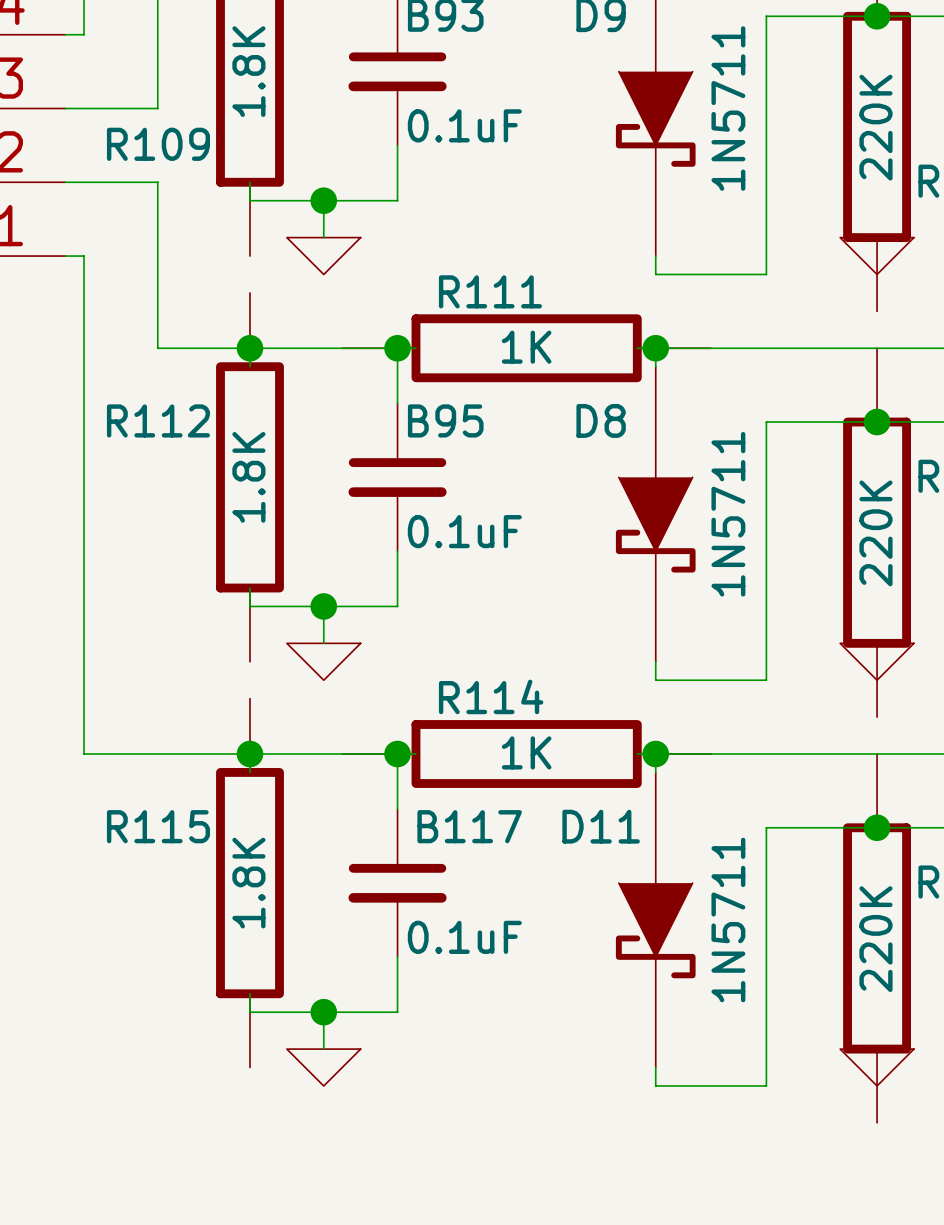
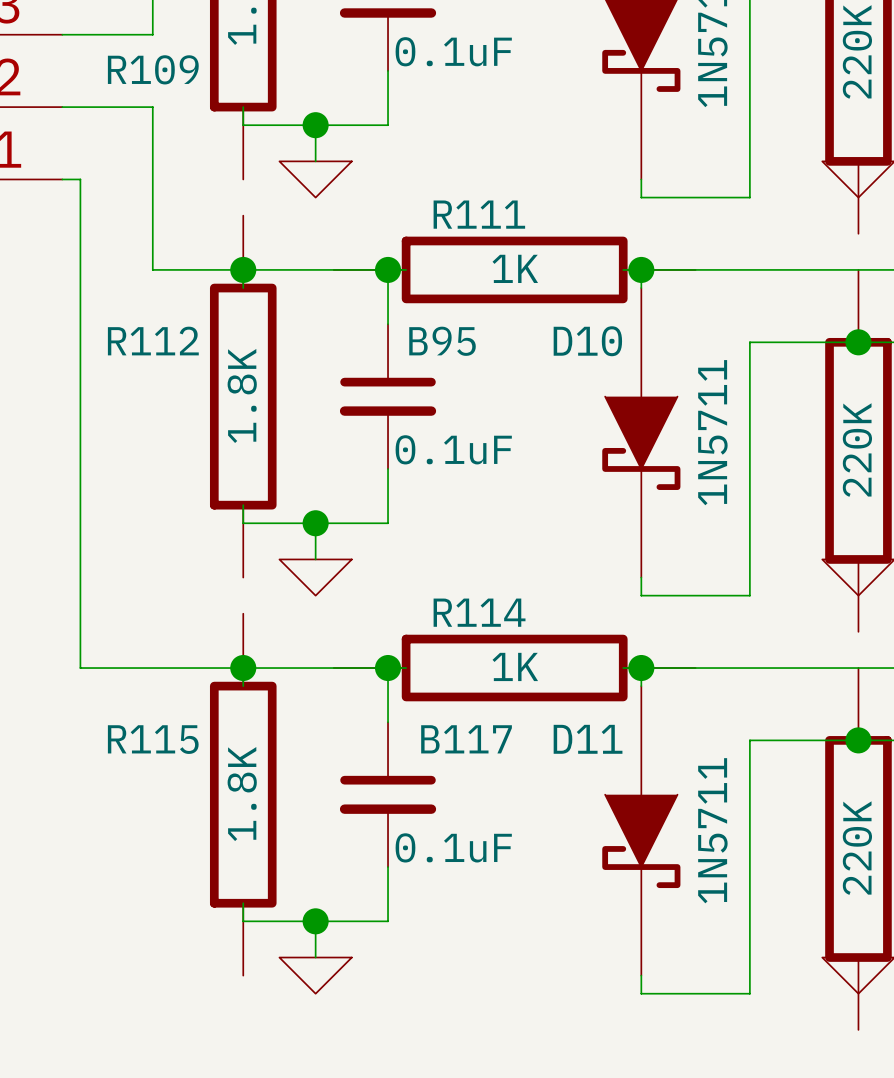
D8 name: D8 (601, 420) -> D10 (587, 341)

